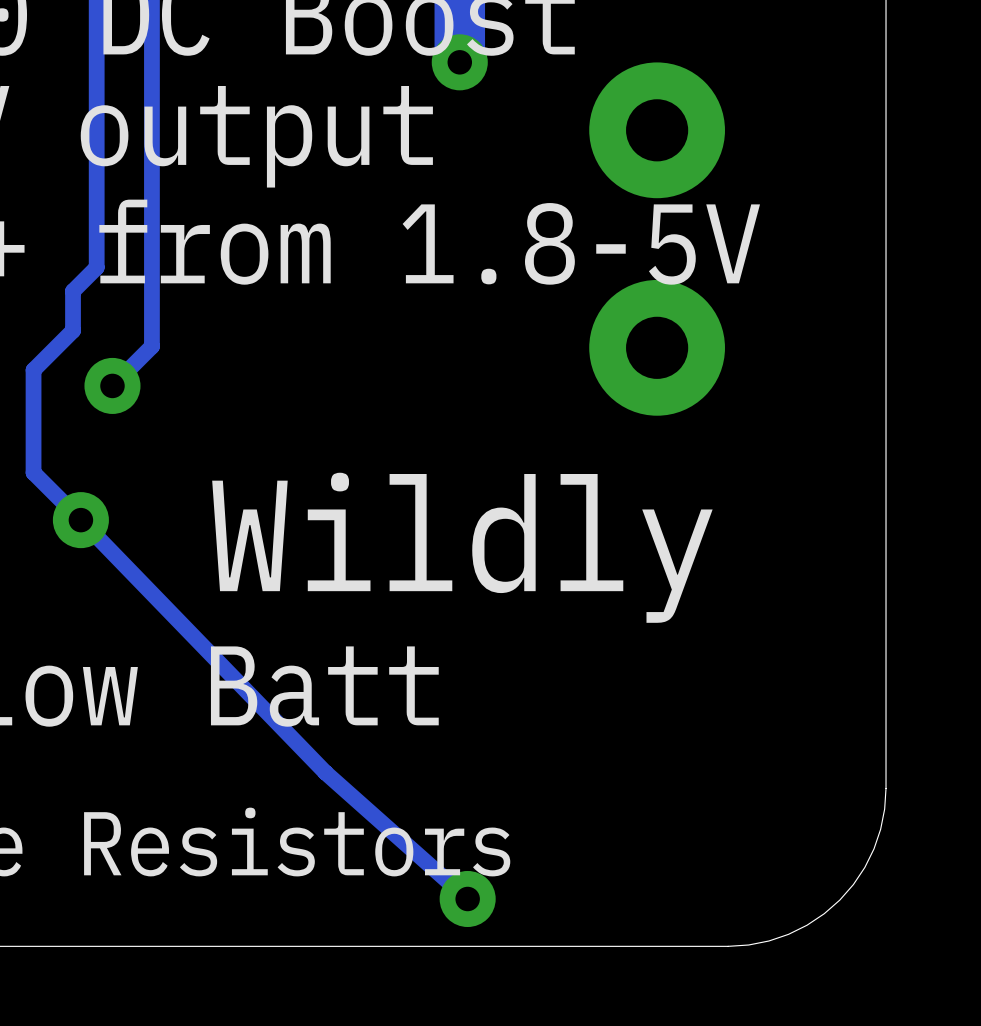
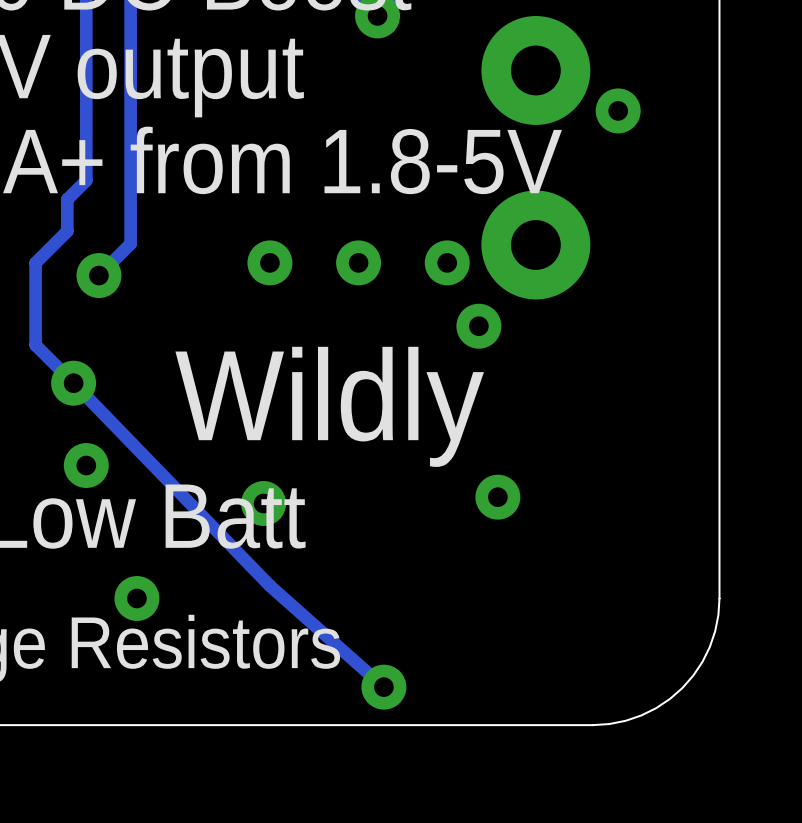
via: none -> (618, 110)
via: none -> (269, 262)
via: none -> (358, 262)
via: none -> (447, 262)
via: none -> (478, 326)
via: none -> (86, 465)
via: none -> (497, 497)
via: none -> (263, 503)
via: none -> (136, 598)

